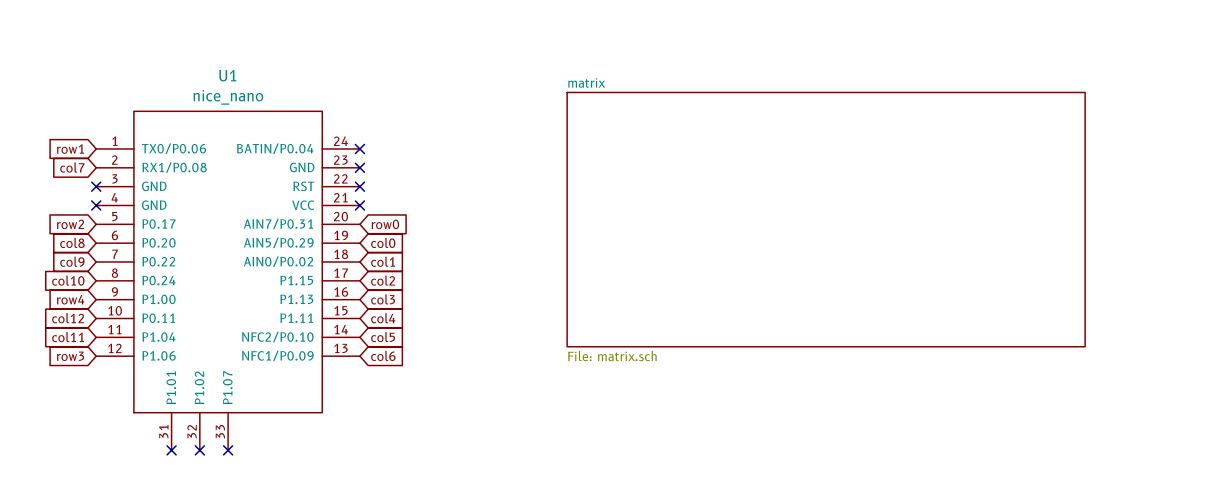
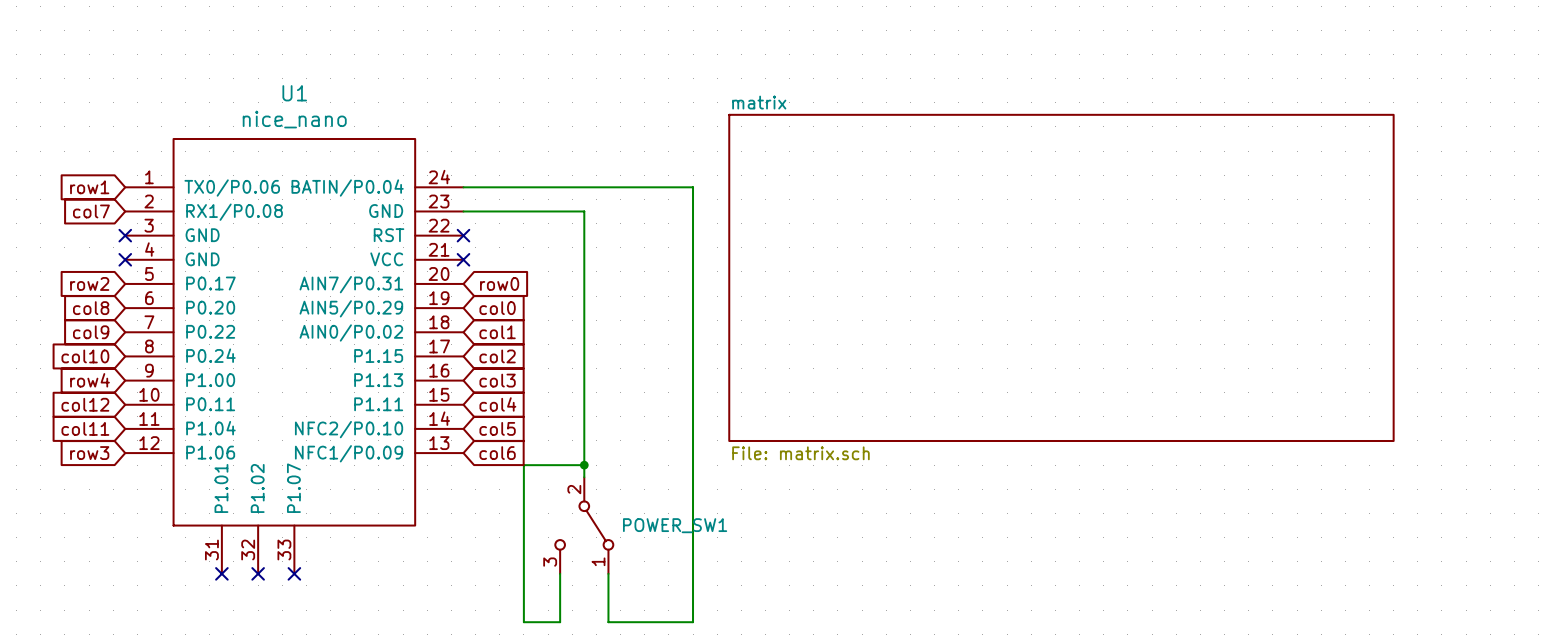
wire: none -> (463, 187) (693, 187) (693, 622) (608, 622) (608, 573)
no-connect mark: (359, 148) -> none
wire: none -> (463, 211) (584, 211) (584, 477)
no-connect mark: (359, 167) -> none
wire: none -> (584, 465) (523, 465) (523, 622) (560, 622) (560, 573)
junction: none -> (584, 465)
POWER_SW1: none -> (584, 525)

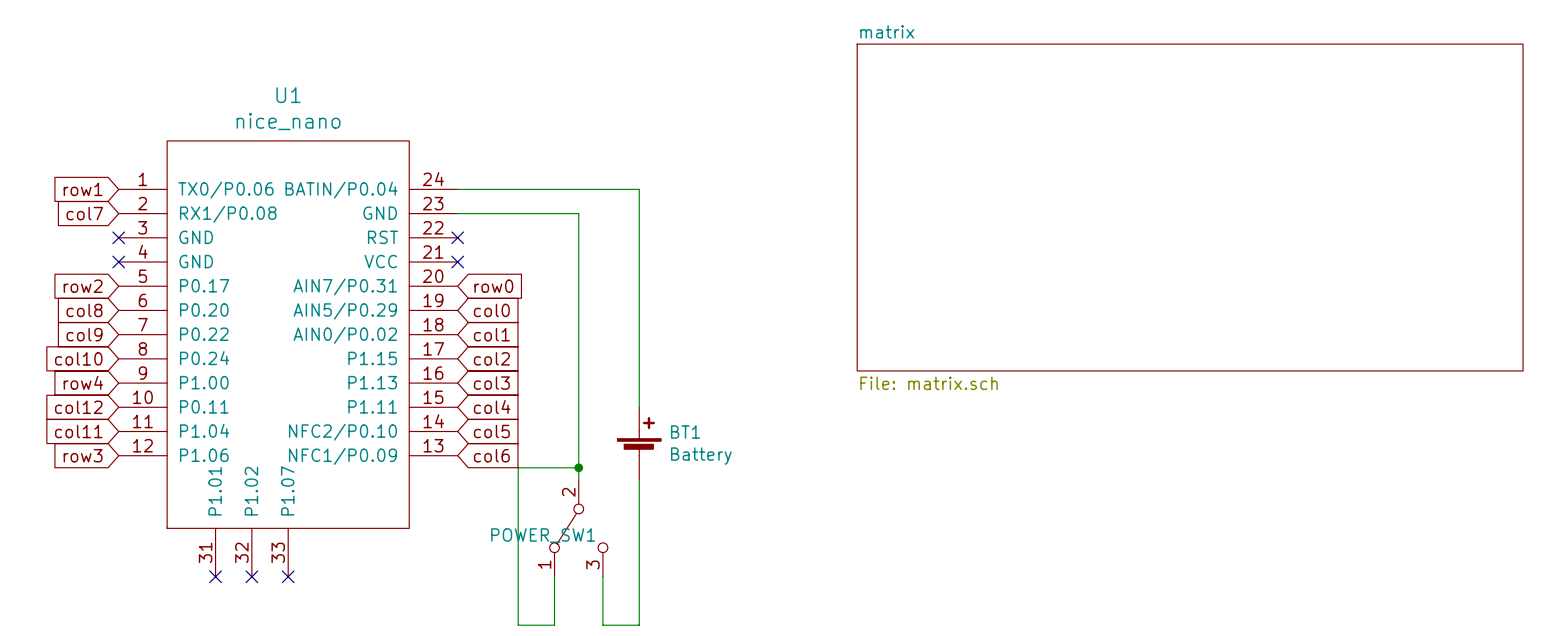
wire: (644, 187) (693, 187) (693, 622) (644, 622) -> (639, 189) (639, 407)
sheet matrix position: (1061, 277) -> (1190, 207)
BT1: none -> Battery (639, 443)
wire: none -> (639, 479) (639, 625)
POWER_SW1 flip: as is (584, 525) -> left-right (578, 528)
POWER_SW1 name position: POWER_SW1 (675, 525) -> POWER_SW1 (543, 535)

